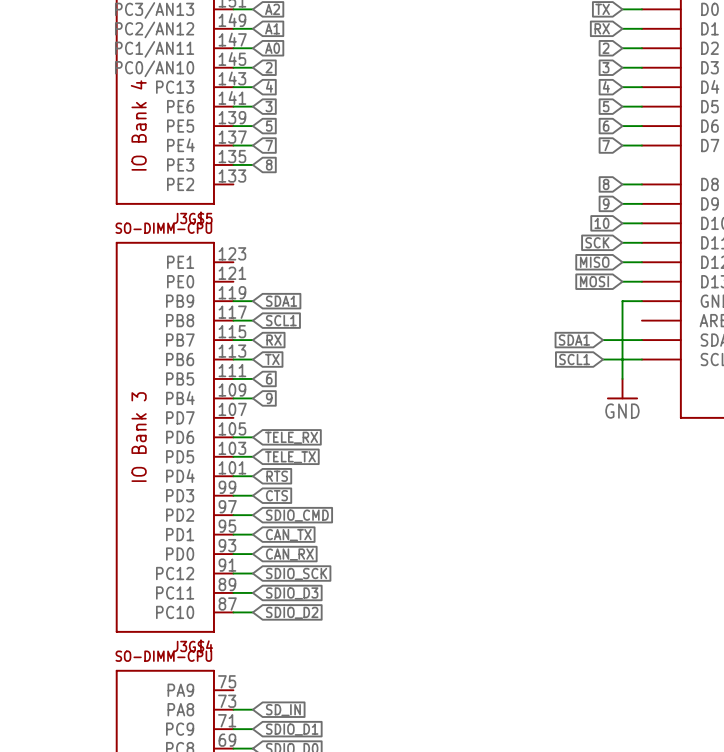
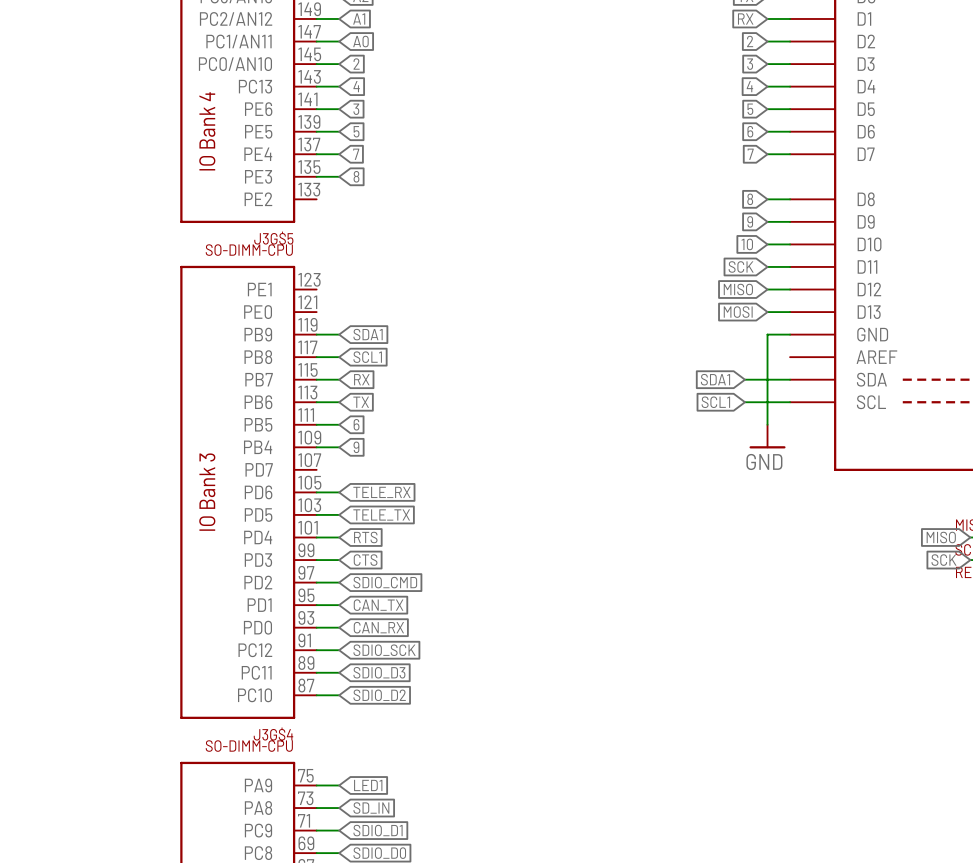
wire: none -> (316, 785) (339, 785)
global label: none -> LED1 (368, 785)

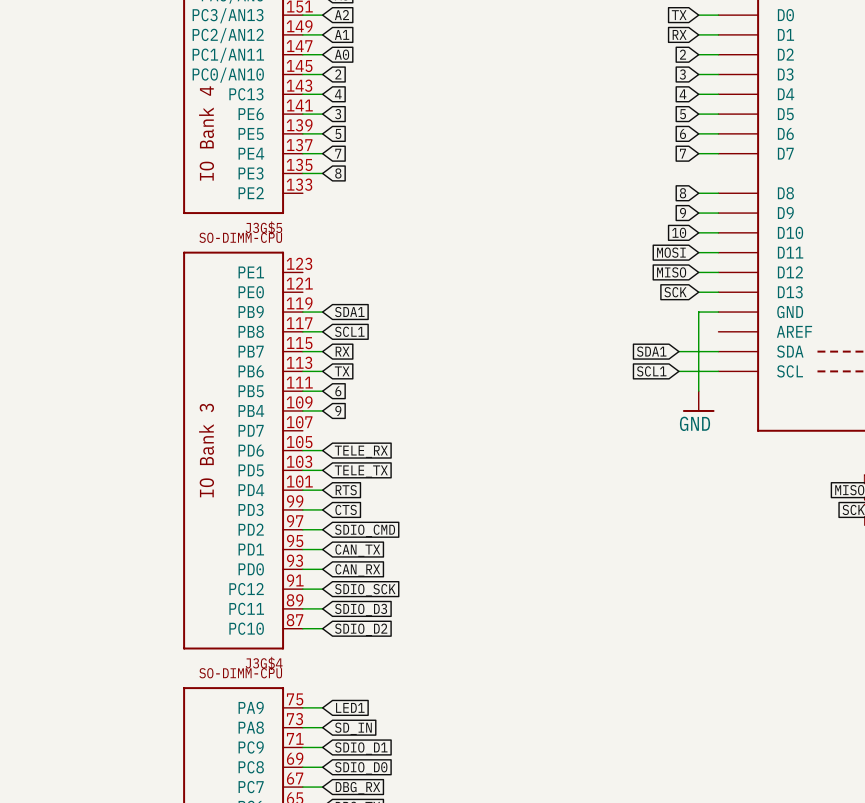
global label: SCK (741, 266) -> MOSI (671, 252)
global label: MOSI (738, 312) -> SCK (675, 292)

